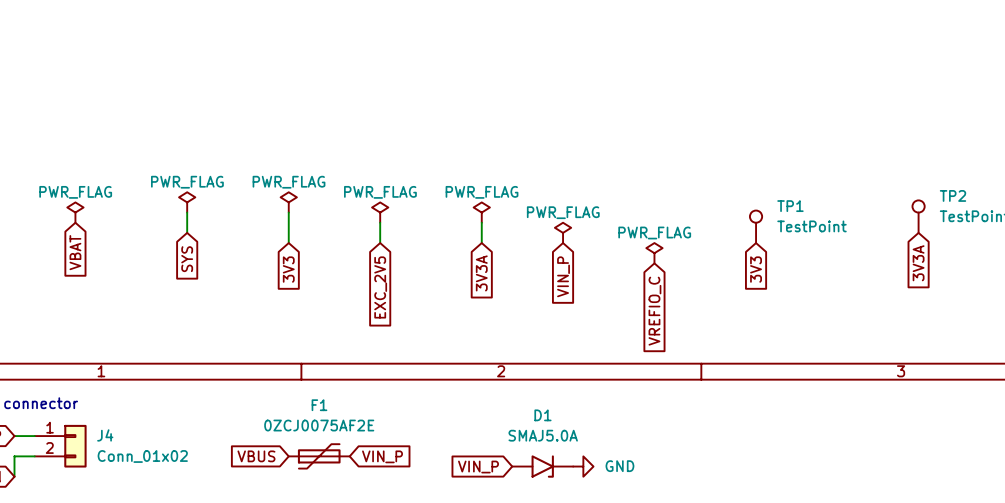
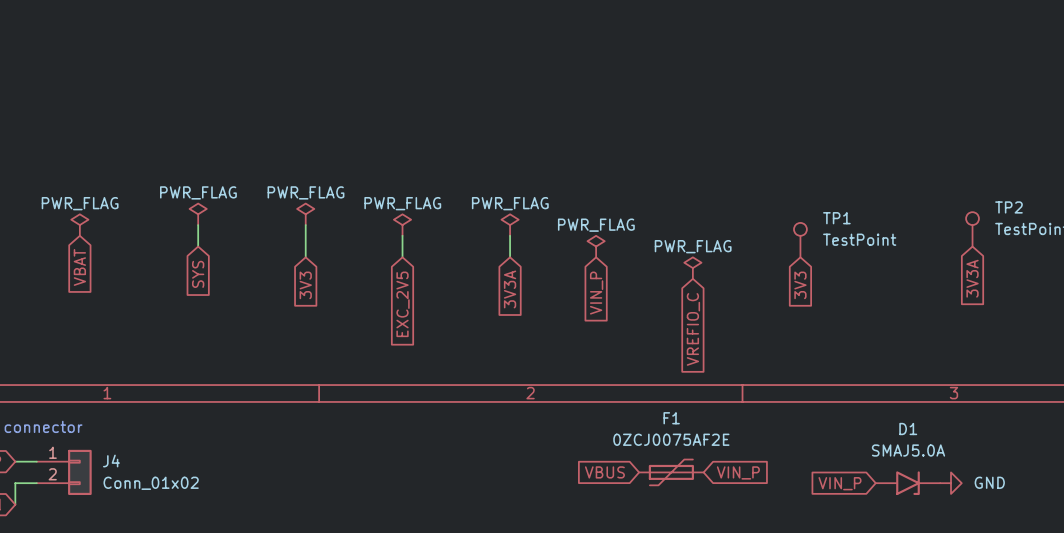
global label: none -> VBUS (604, 472)
global label: VBUS (256, 456) -> none
F1 position: (319, 456) -> (671, 472)
global label: VIN_P (382, 456) -> none
global label: none -> VIN_P (839, 483)
power symbol: none -> GND (951, 483)
D1 position: (542, 466) -> (907, 483)
power symbol: GND (583, 466) -> none
global label rotation: 0° (478, 467) -> 180° (738, 472)
global label position: VIN_P (478, 467) -> VIN_P (738, 472)

